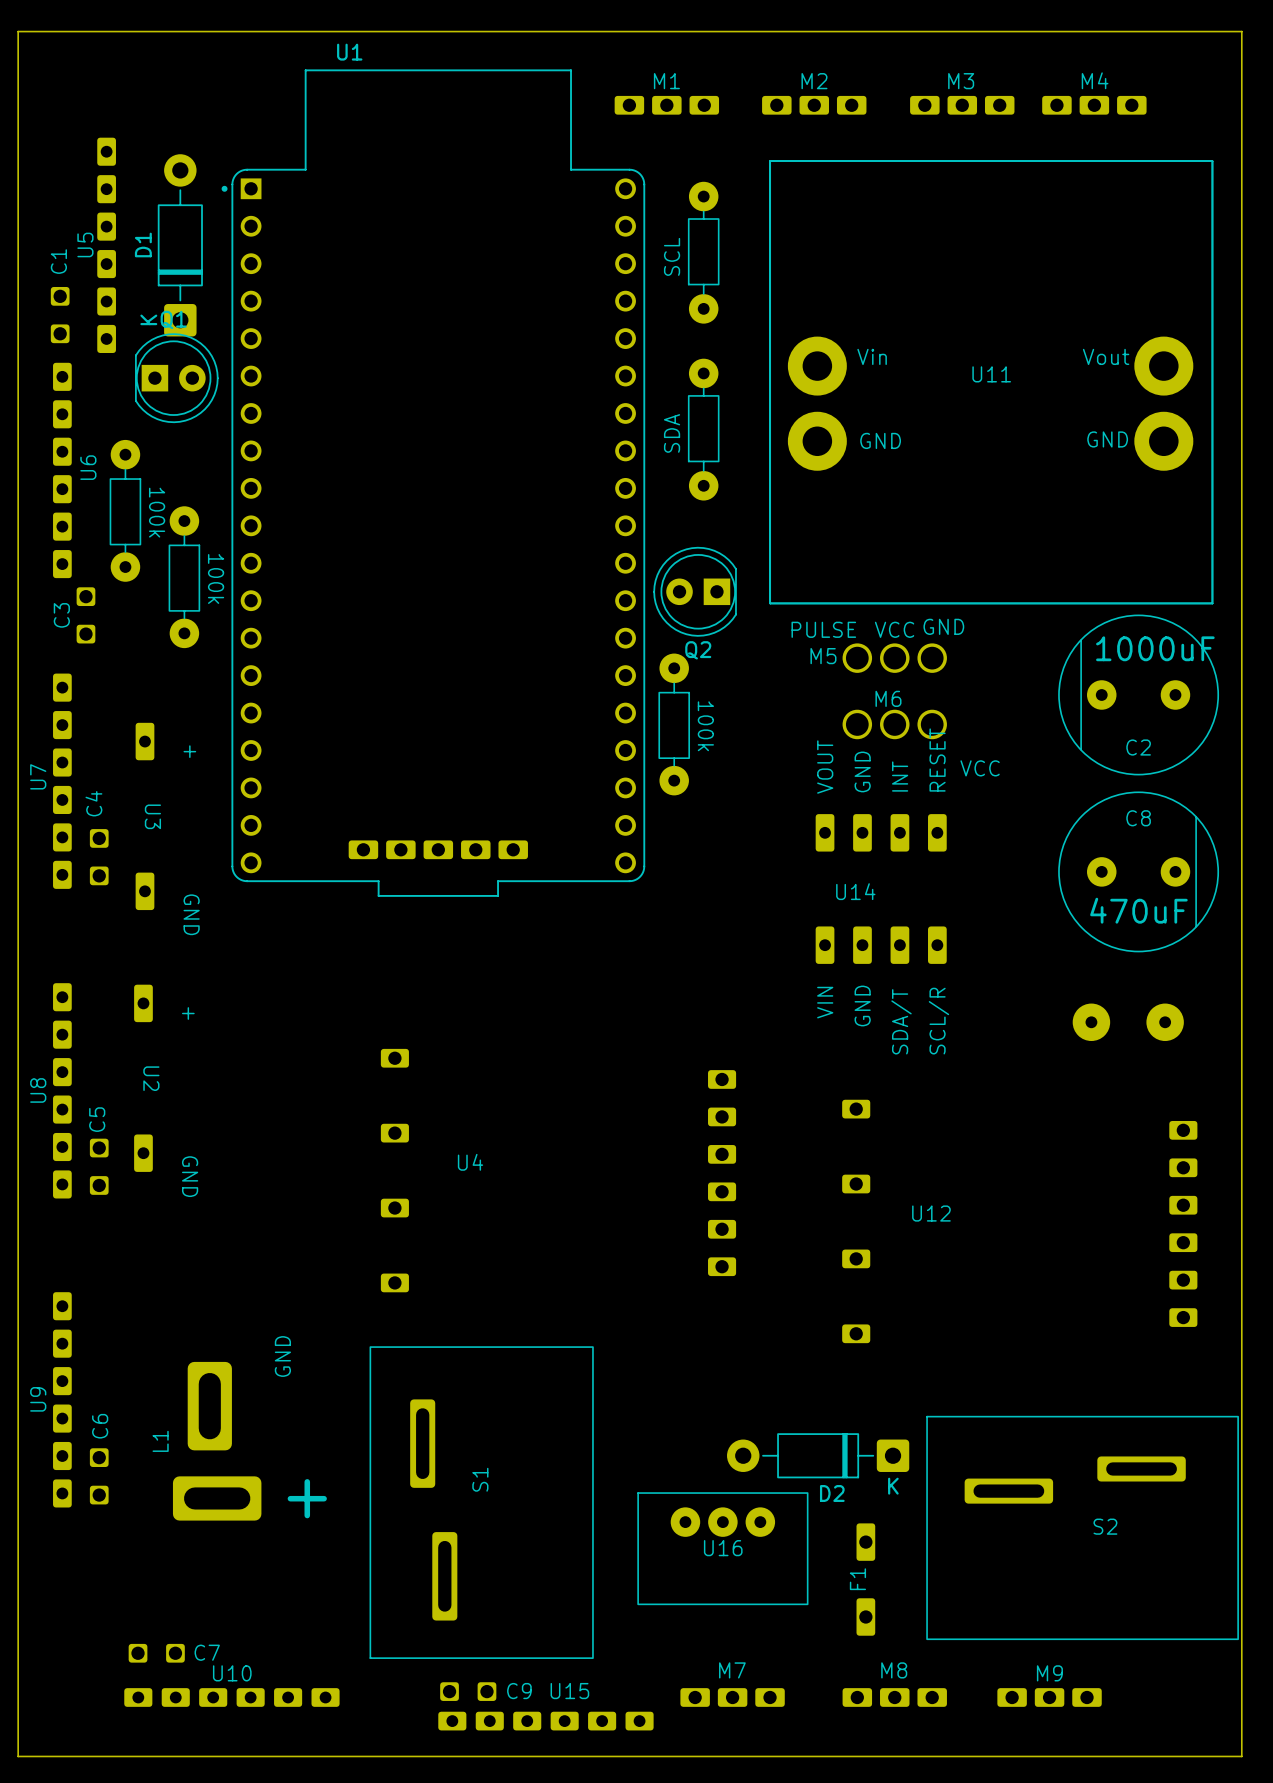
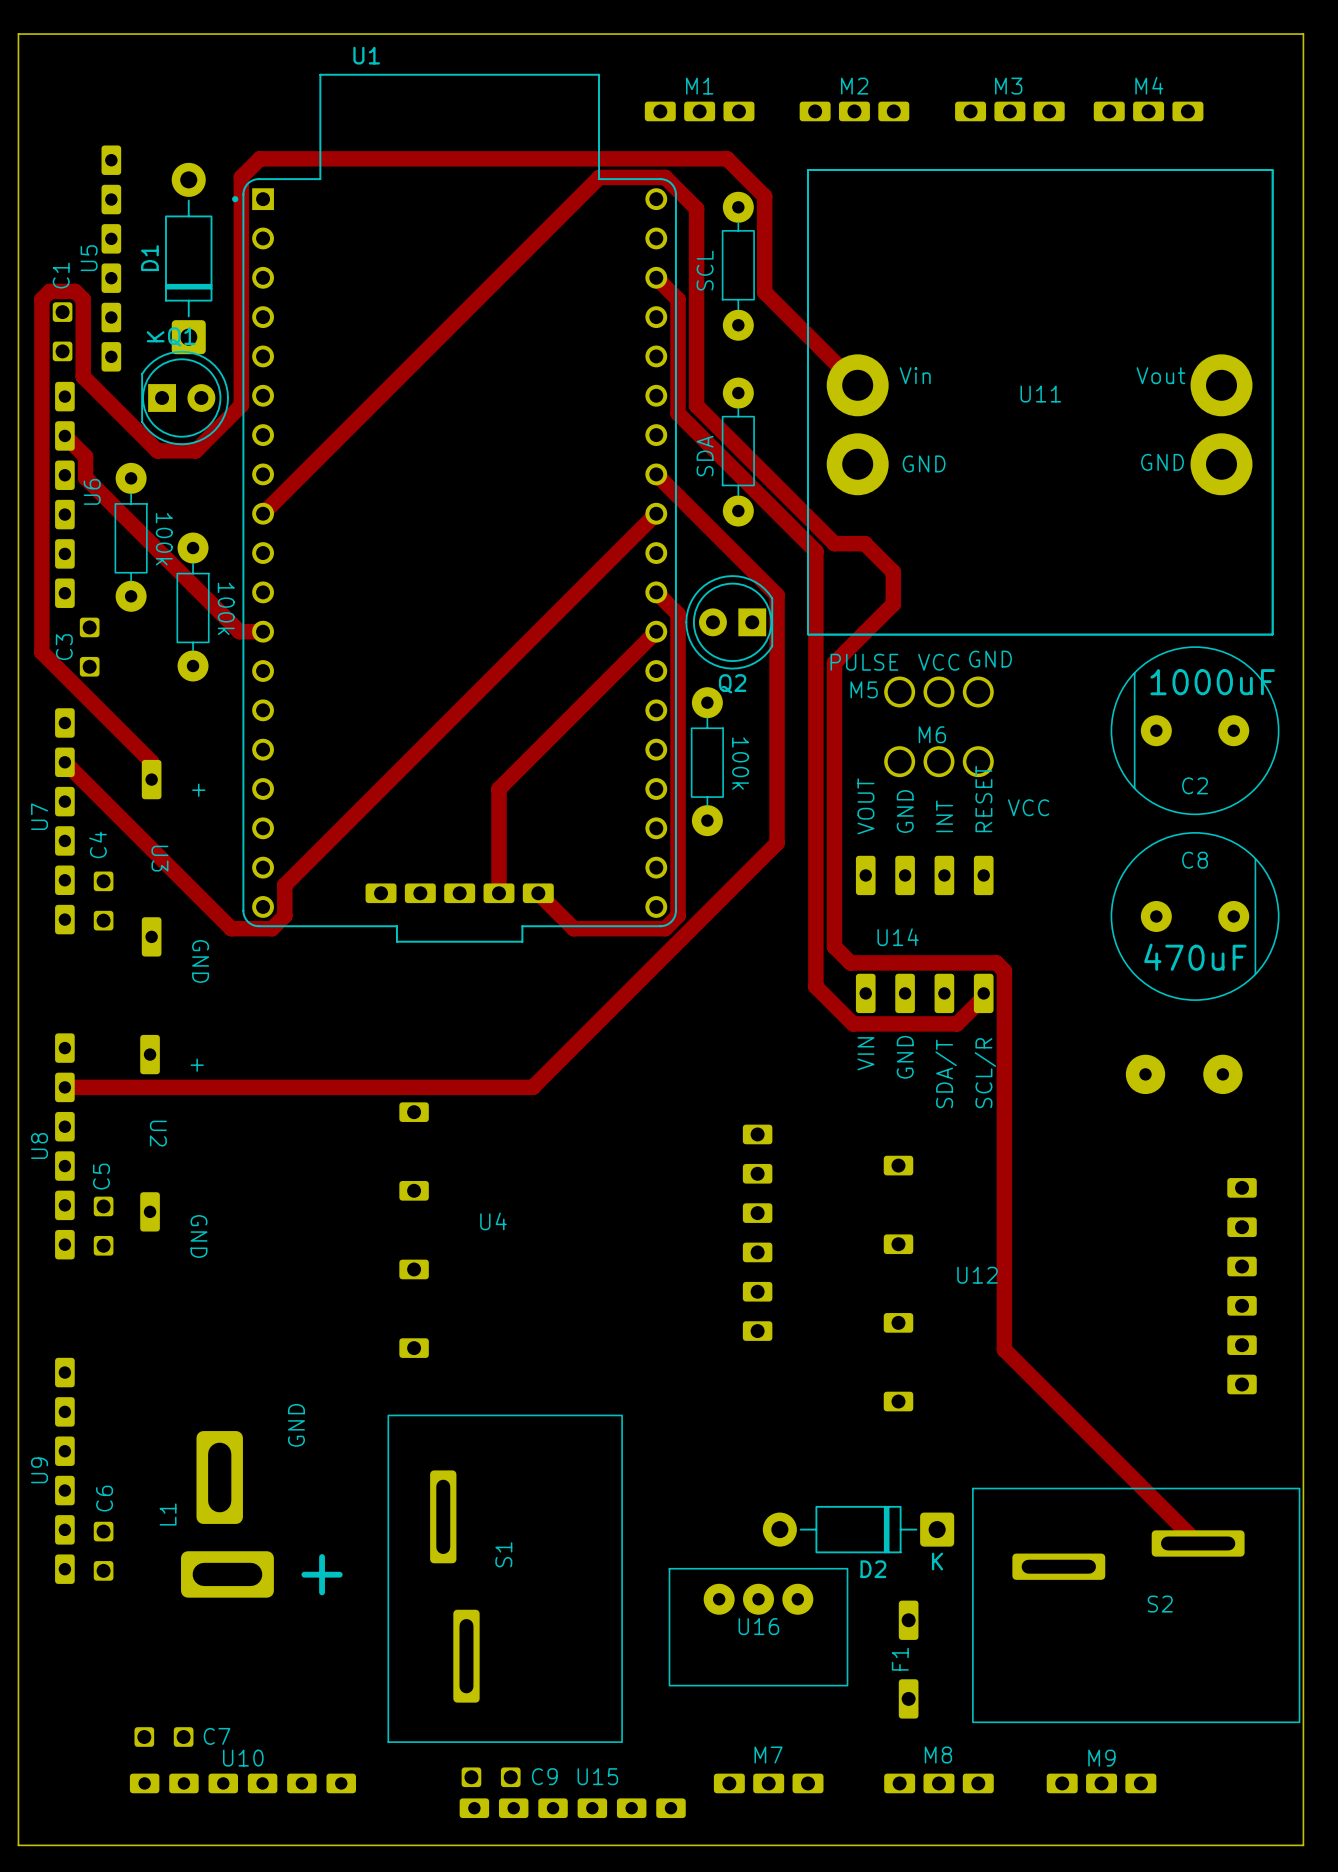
track: none -> (656, 277) (678, 299) (678, 413) (815, 551) (815, 986) (853, 1023) (957, 1023) (983, 997) (983, 993)
track: none -> (857, 385) (764, 292) (764, 196) (727, 158) (259, 158) (241, 177) (241, 405) (195, 450) (157, 450) (83, 376) (83, 299) (75, 291) (49, 291) (41, 299) (41, 652) (151, 762) (151, 779)
track: none -> (64, 435) (85, 456) (85, 477) (239, 631) (263, 631)
track: none -> (656, 474) (777, 595) (777, 843) (532, 1087) (64, 1087)
track: none -> (263, 513) (599, 177) (665, 177) (696, 208) (696, 405) (834, 543) (864, 543) (893, 572) (893, 604) (834, 662) (834, 946) (850, 962) (996, 962) (1004, 970) (1004, 1349) (1198, 1543)
track: none -> (656, 513) (284, 885) (284, 915) (272, 928) (231, 928) (64, 762)
track: none -> (656, 592) (678, 614) (678, 915) (665, 928) (573, 928) (538, 893)
track: none -> (656, 631) (499, 788) (499, 893)

